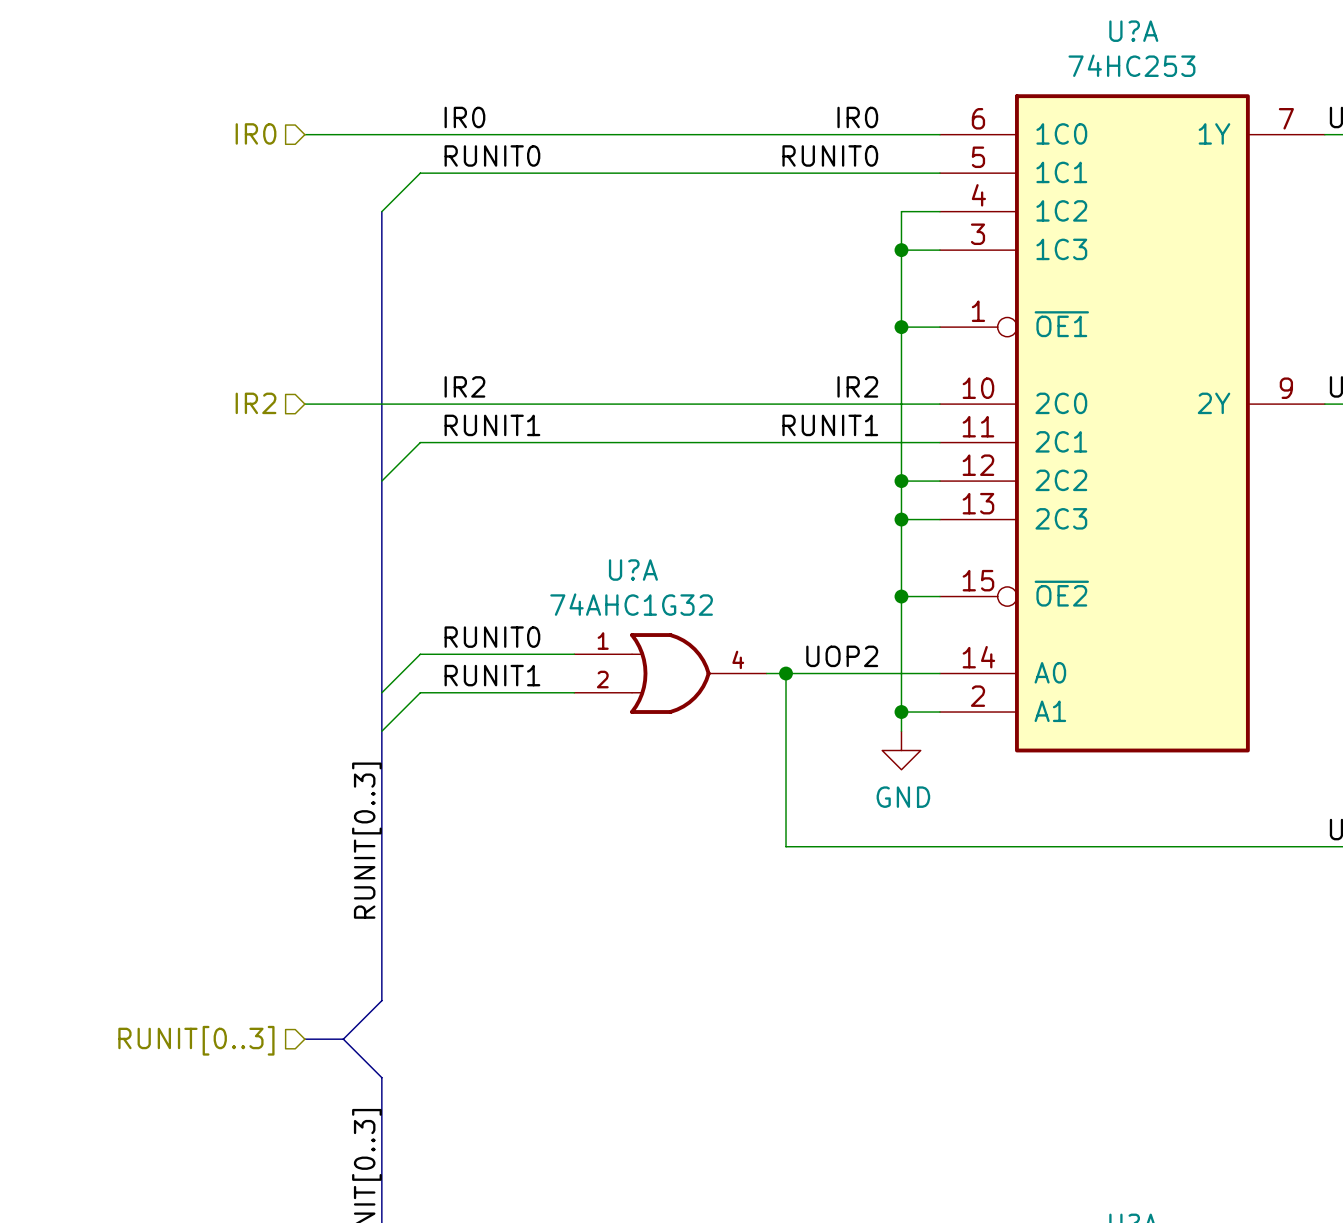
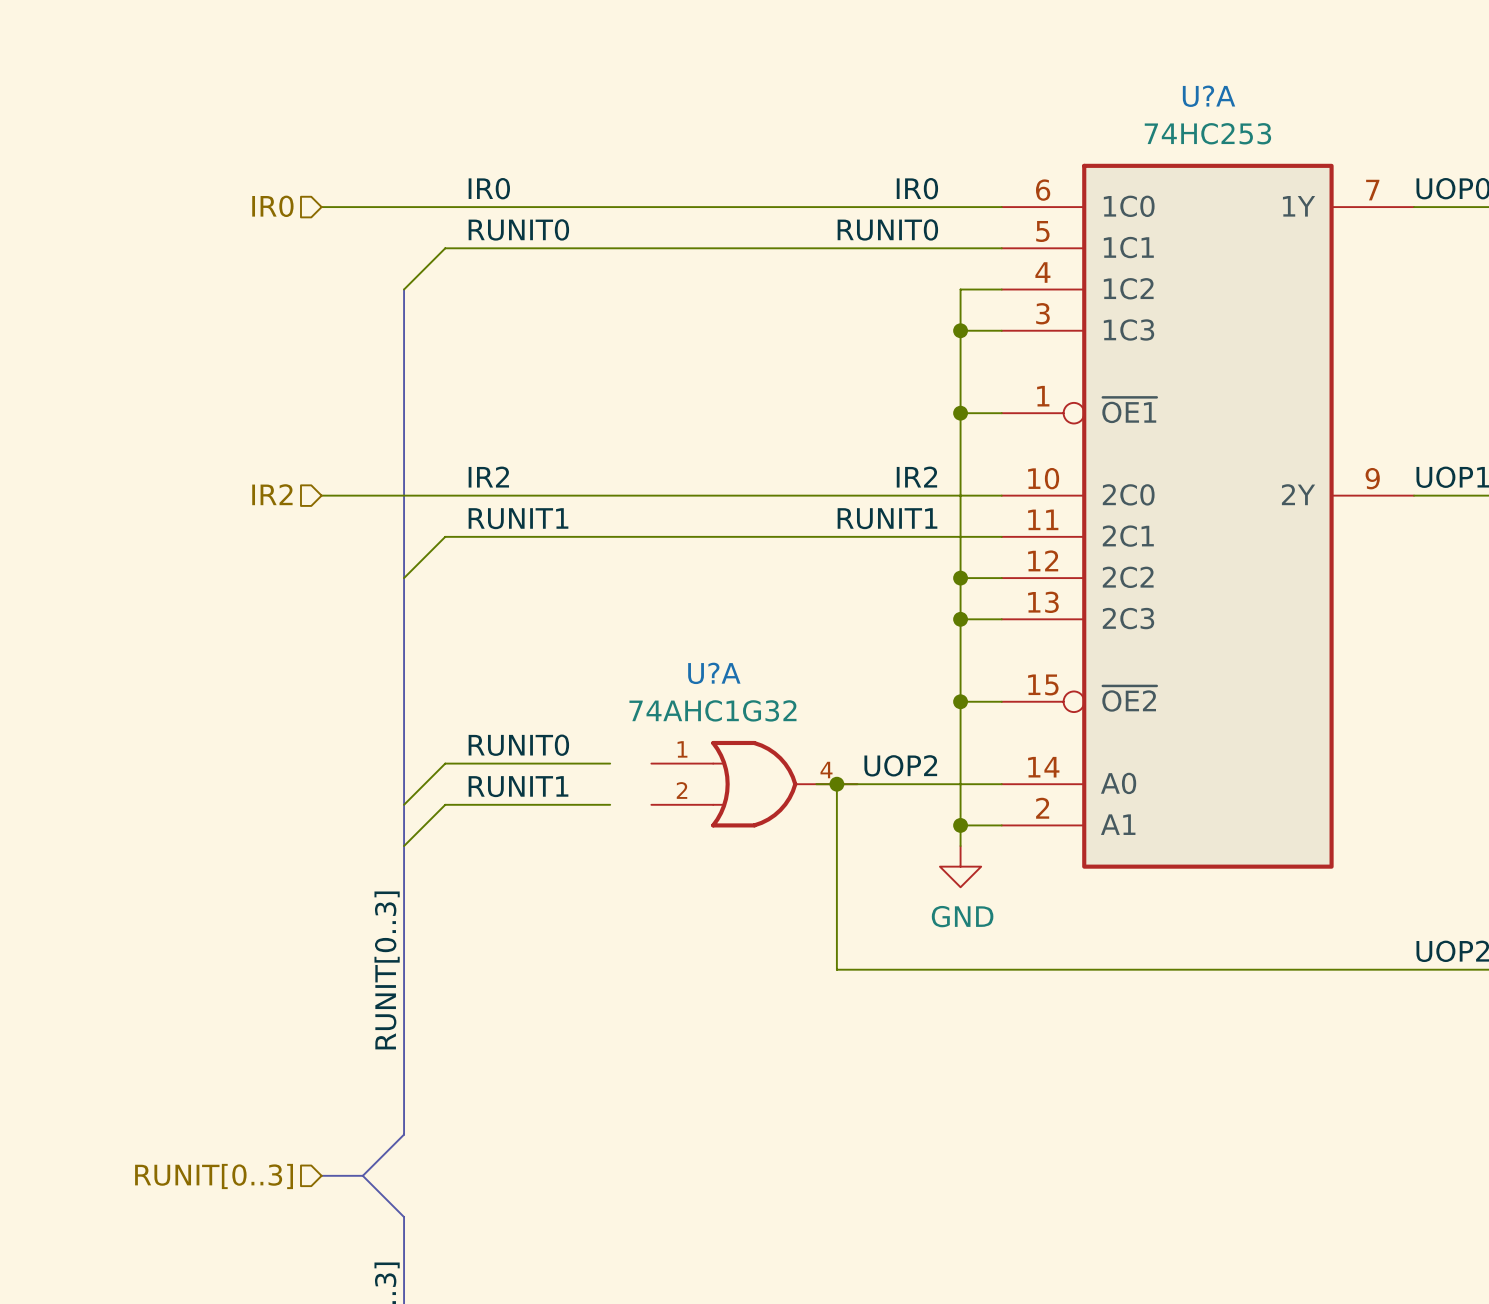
U?A position: (670, 673) -> (754, 784)

